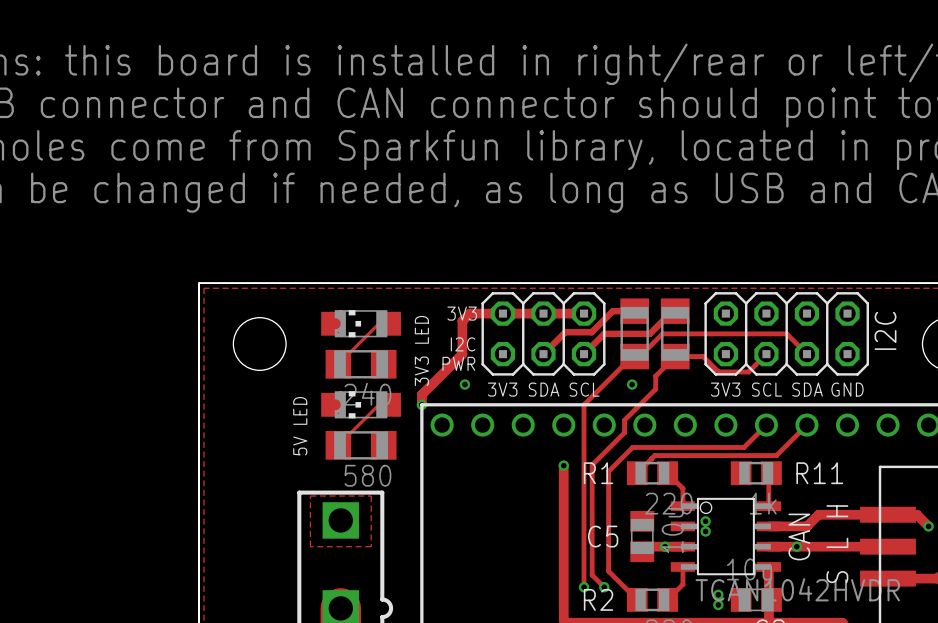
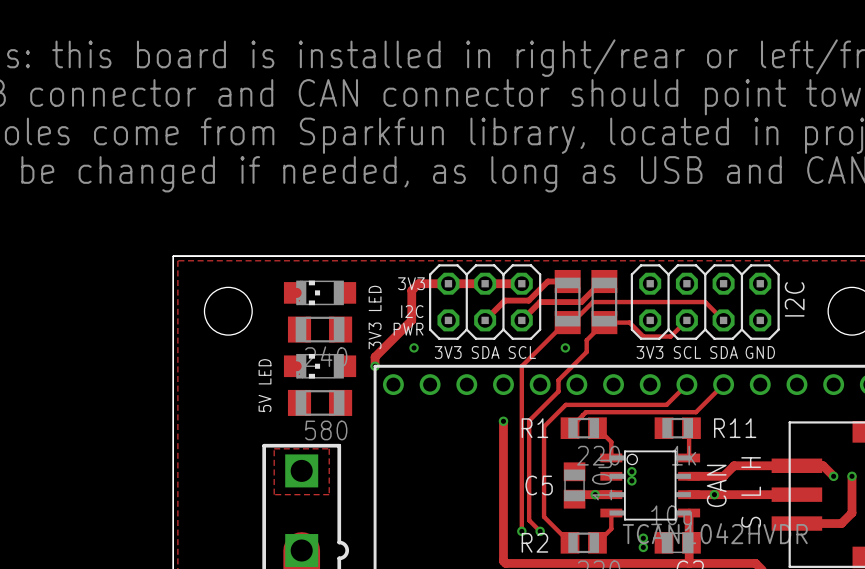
track: (389, 323) (378, 323) (338, 364) -> none
track: (389, 404) (378, 404) (338, 445) -> none

